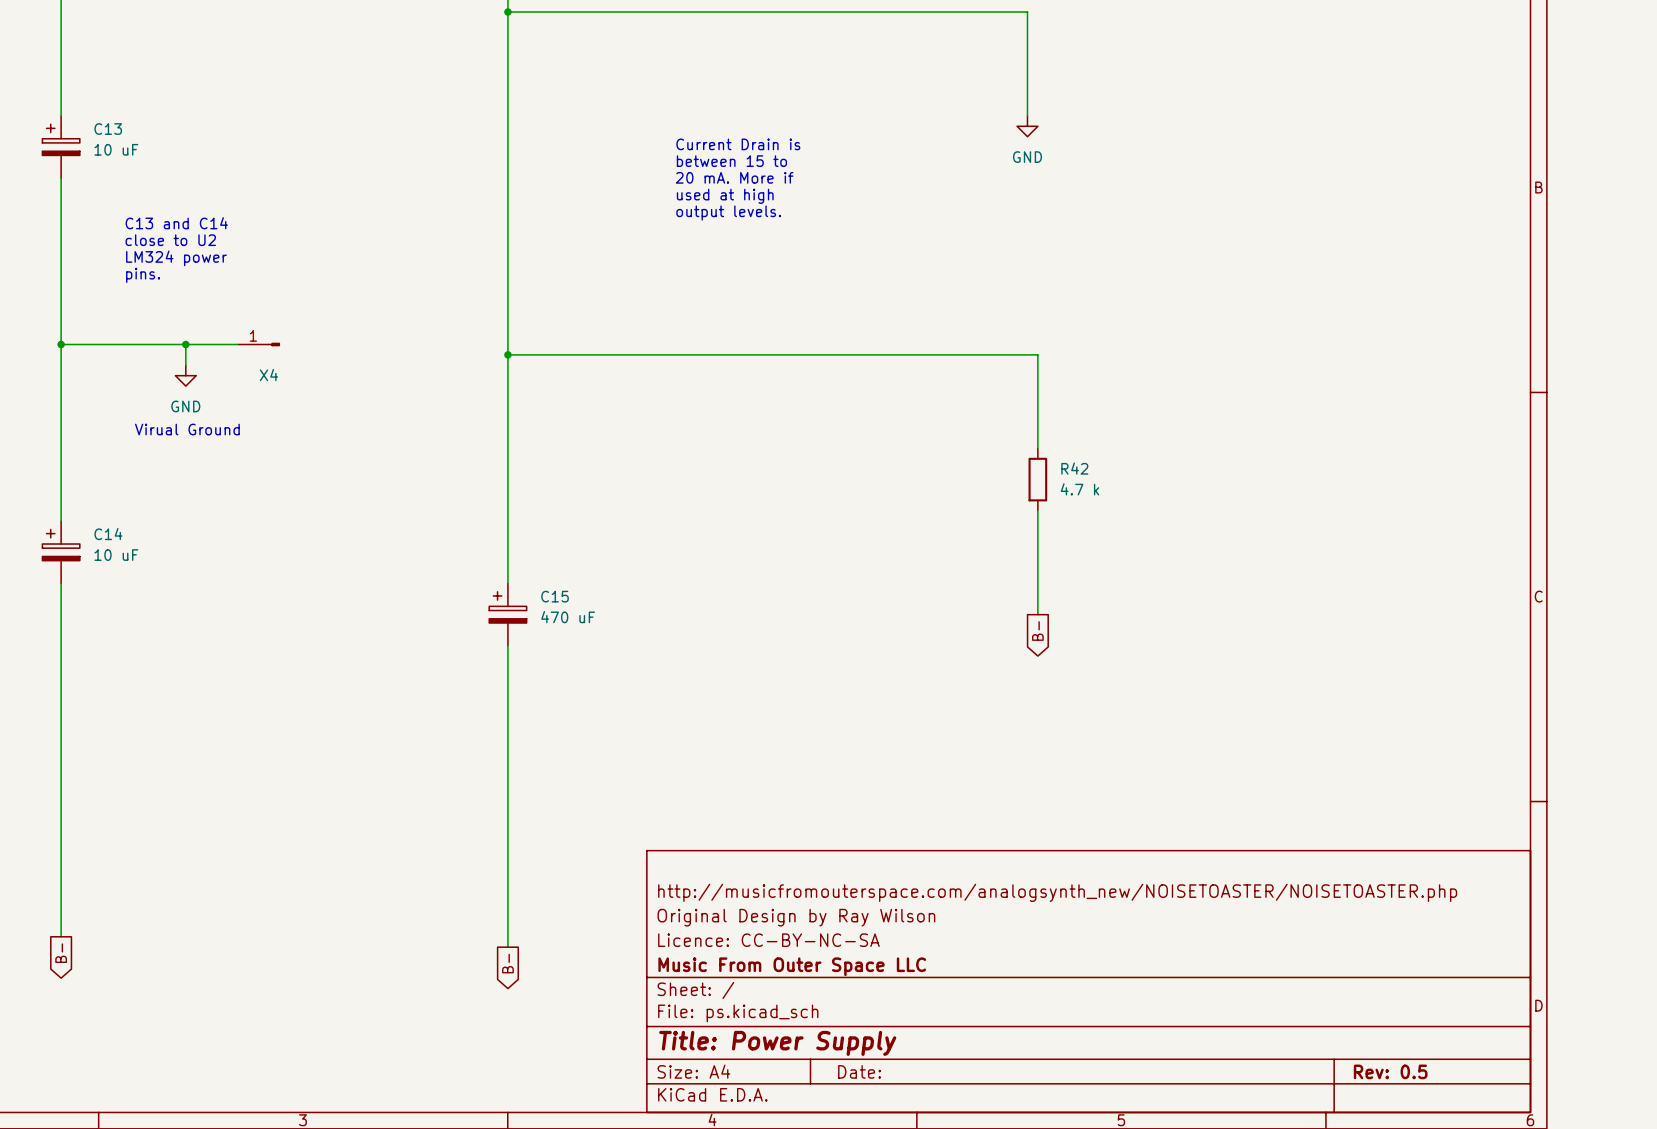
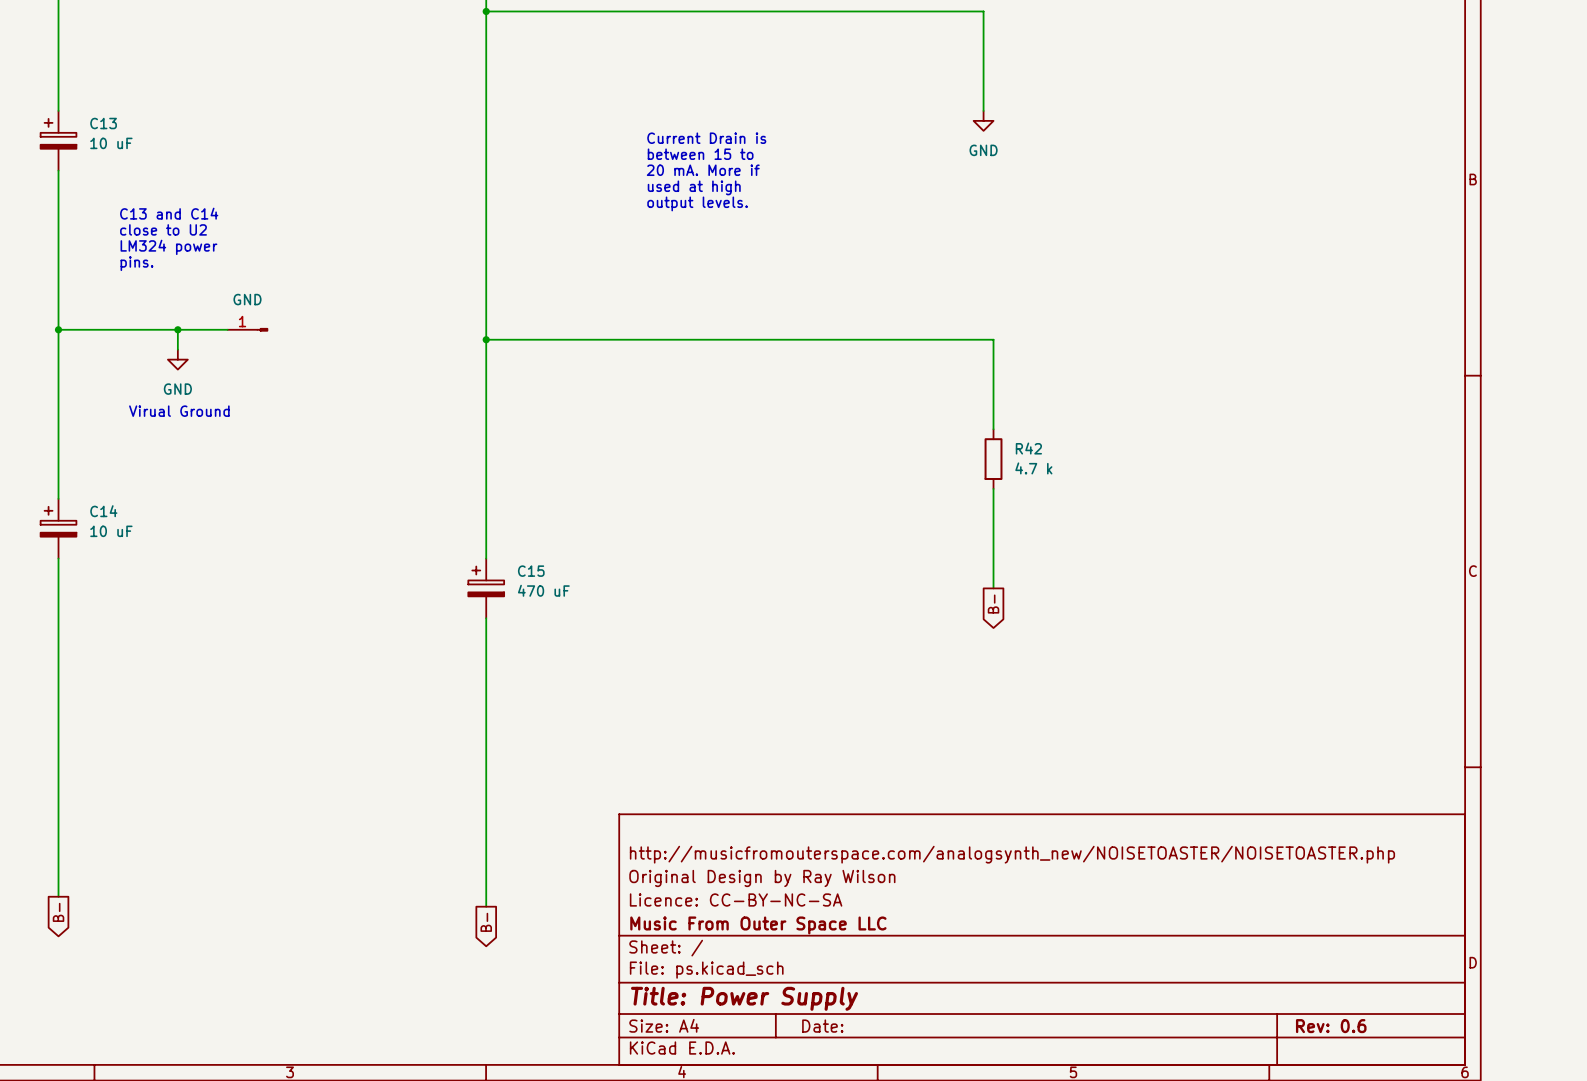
X4 value: none -> GND (247, 299)
X4 name: X4 (268, 375) -> none
title block: Rev: 0.5 (1390, 1071) -> Rev: 0.6 (1331, 1026)

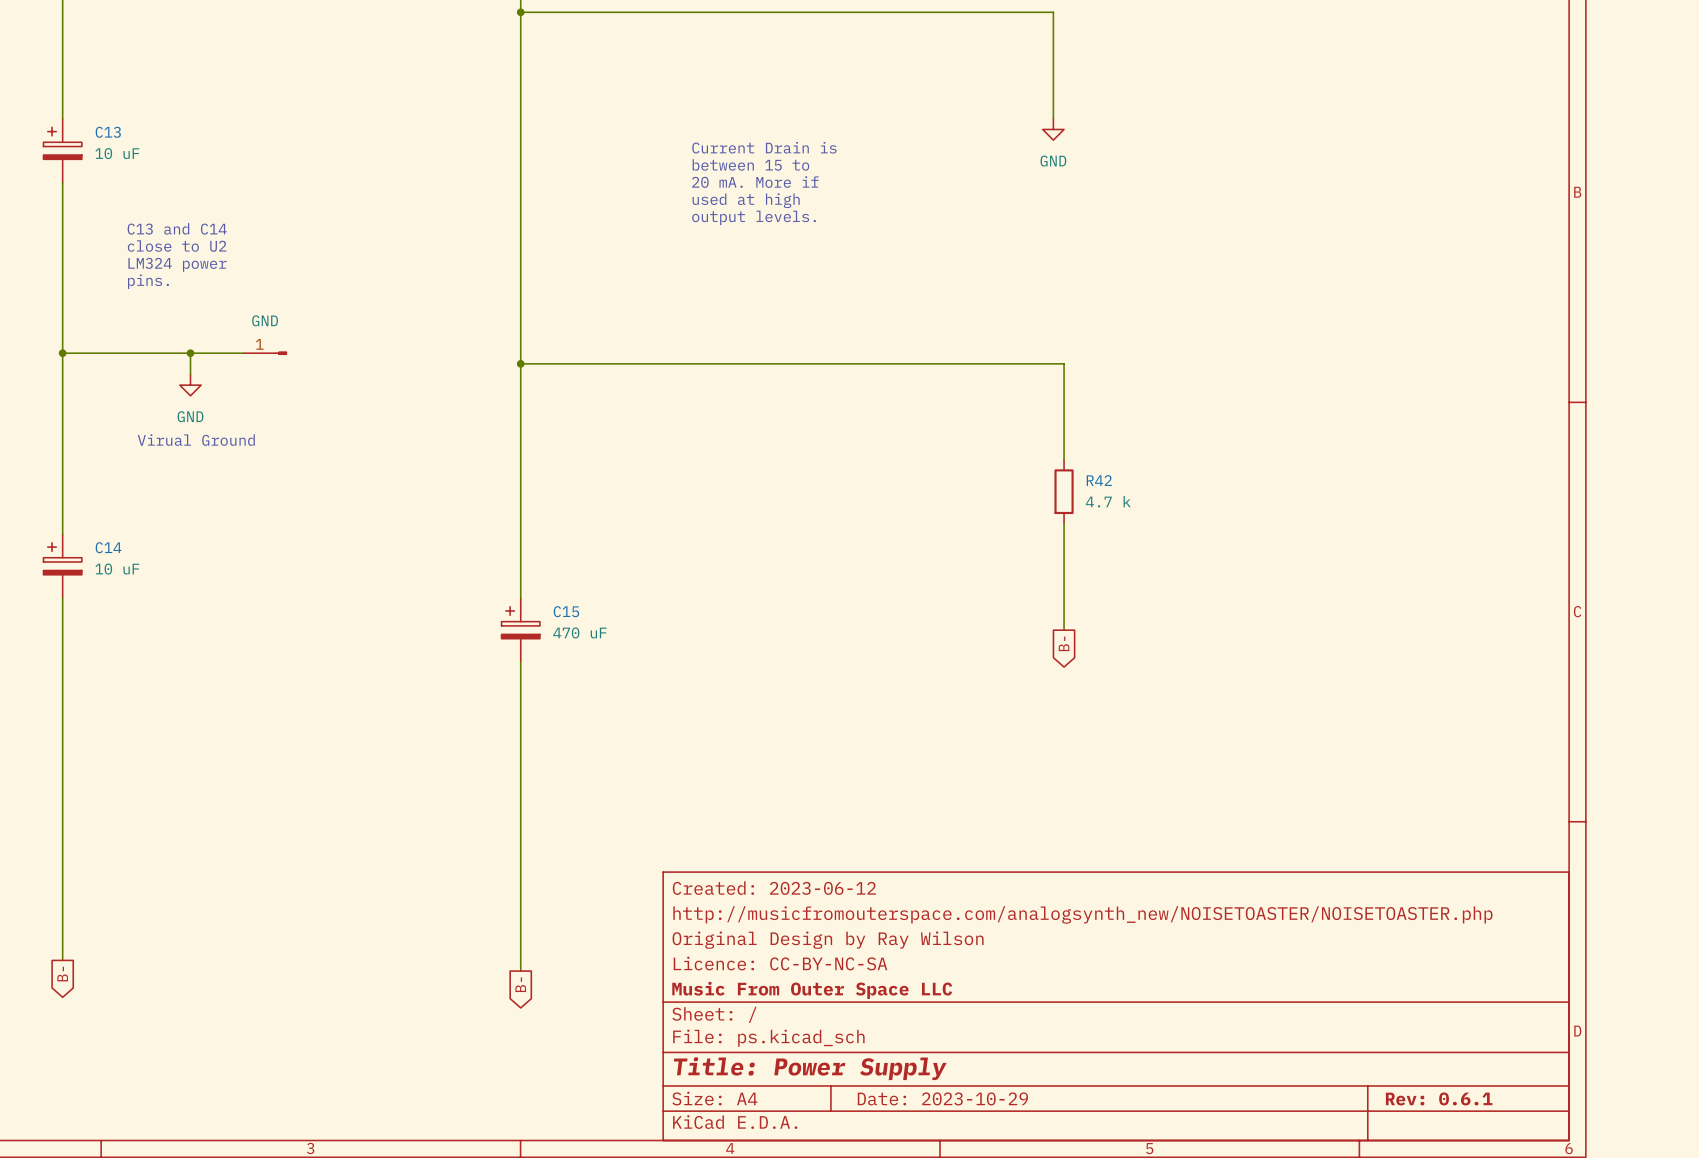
title block: none -> Created: 2023-06-12 (774, 888)
title block: Date: (822, 1026) -> Date: 2023-10-29 (942, 1098)
title block: Rev: 0.6 (1331, 1026) -> Rev: 0.6.1 (1439, 1098)

